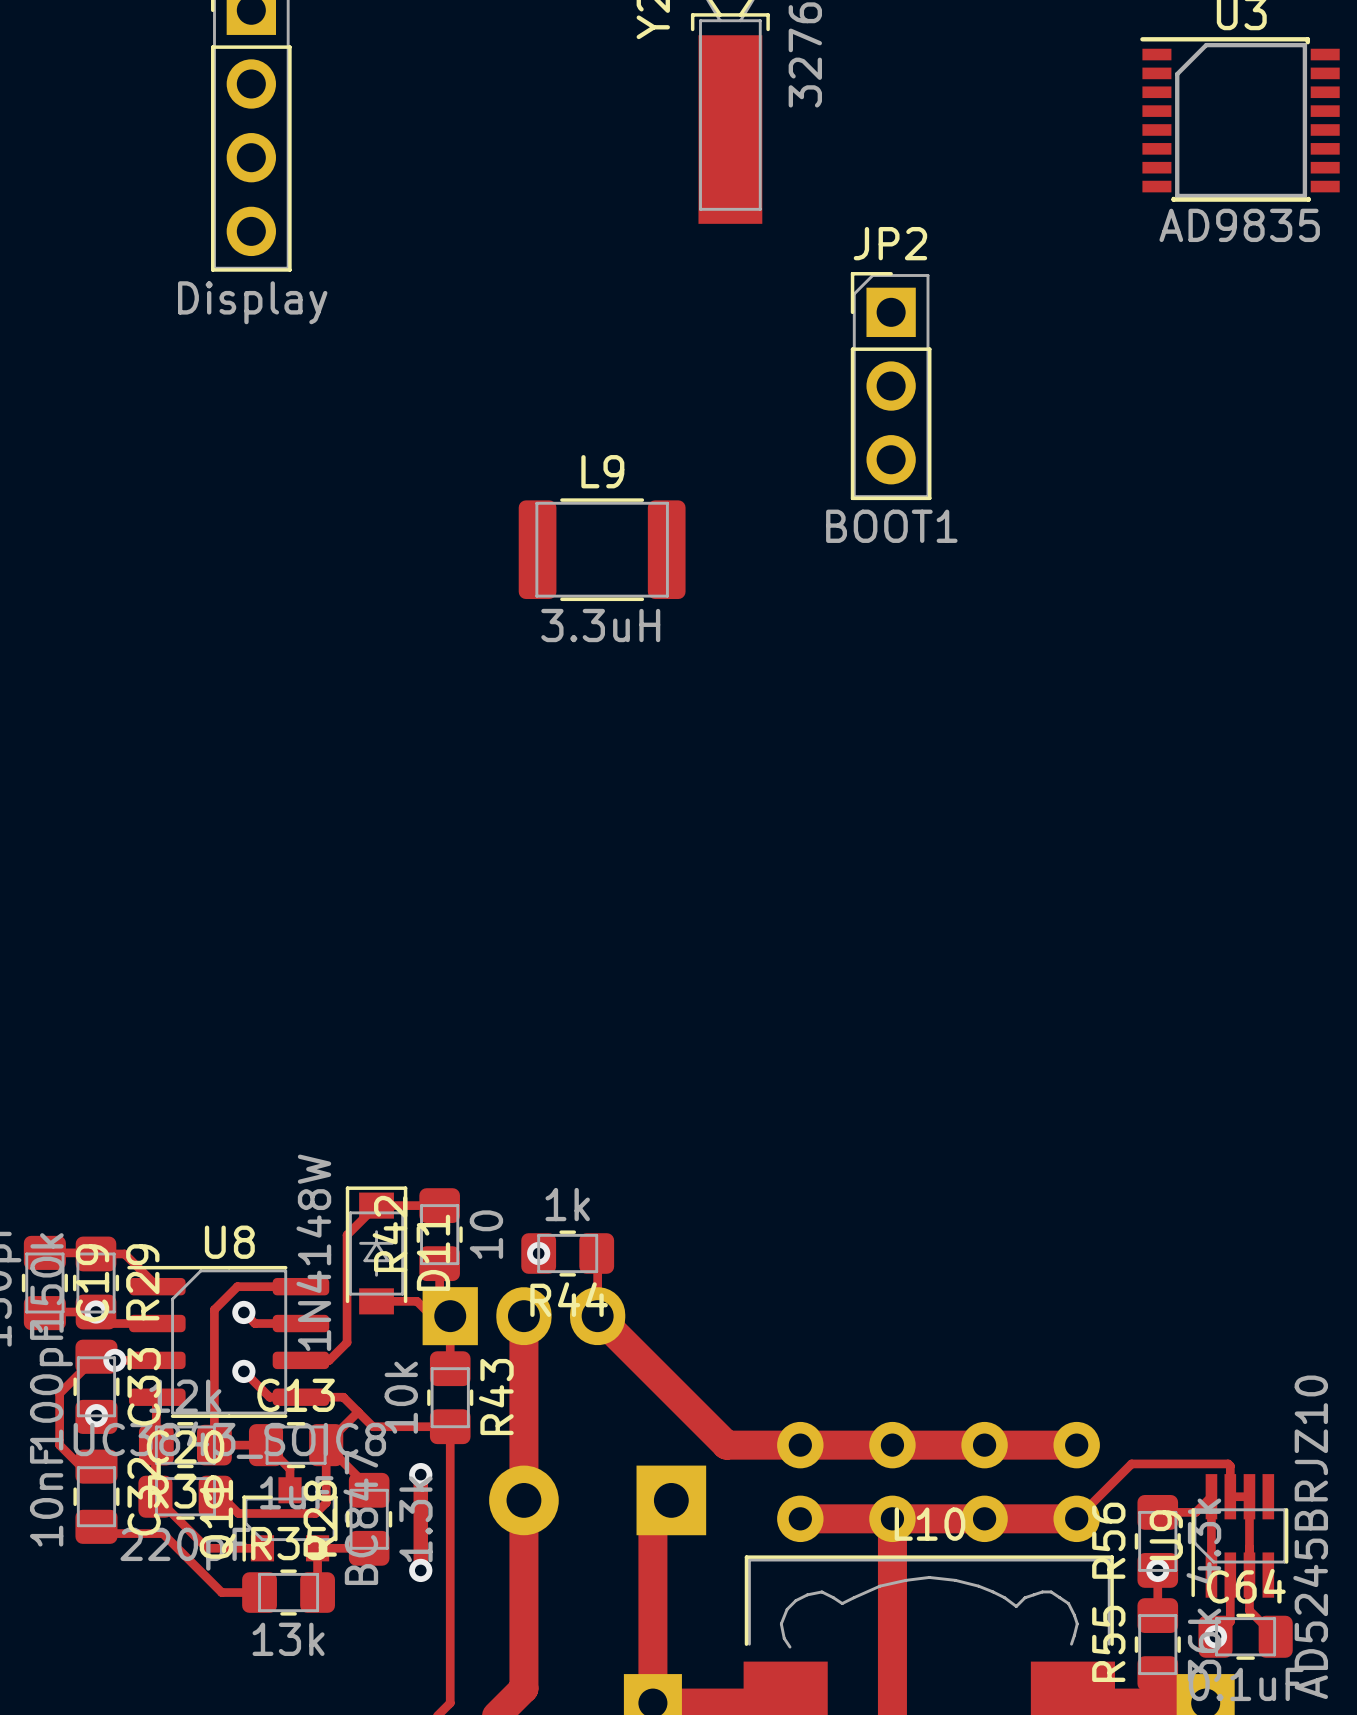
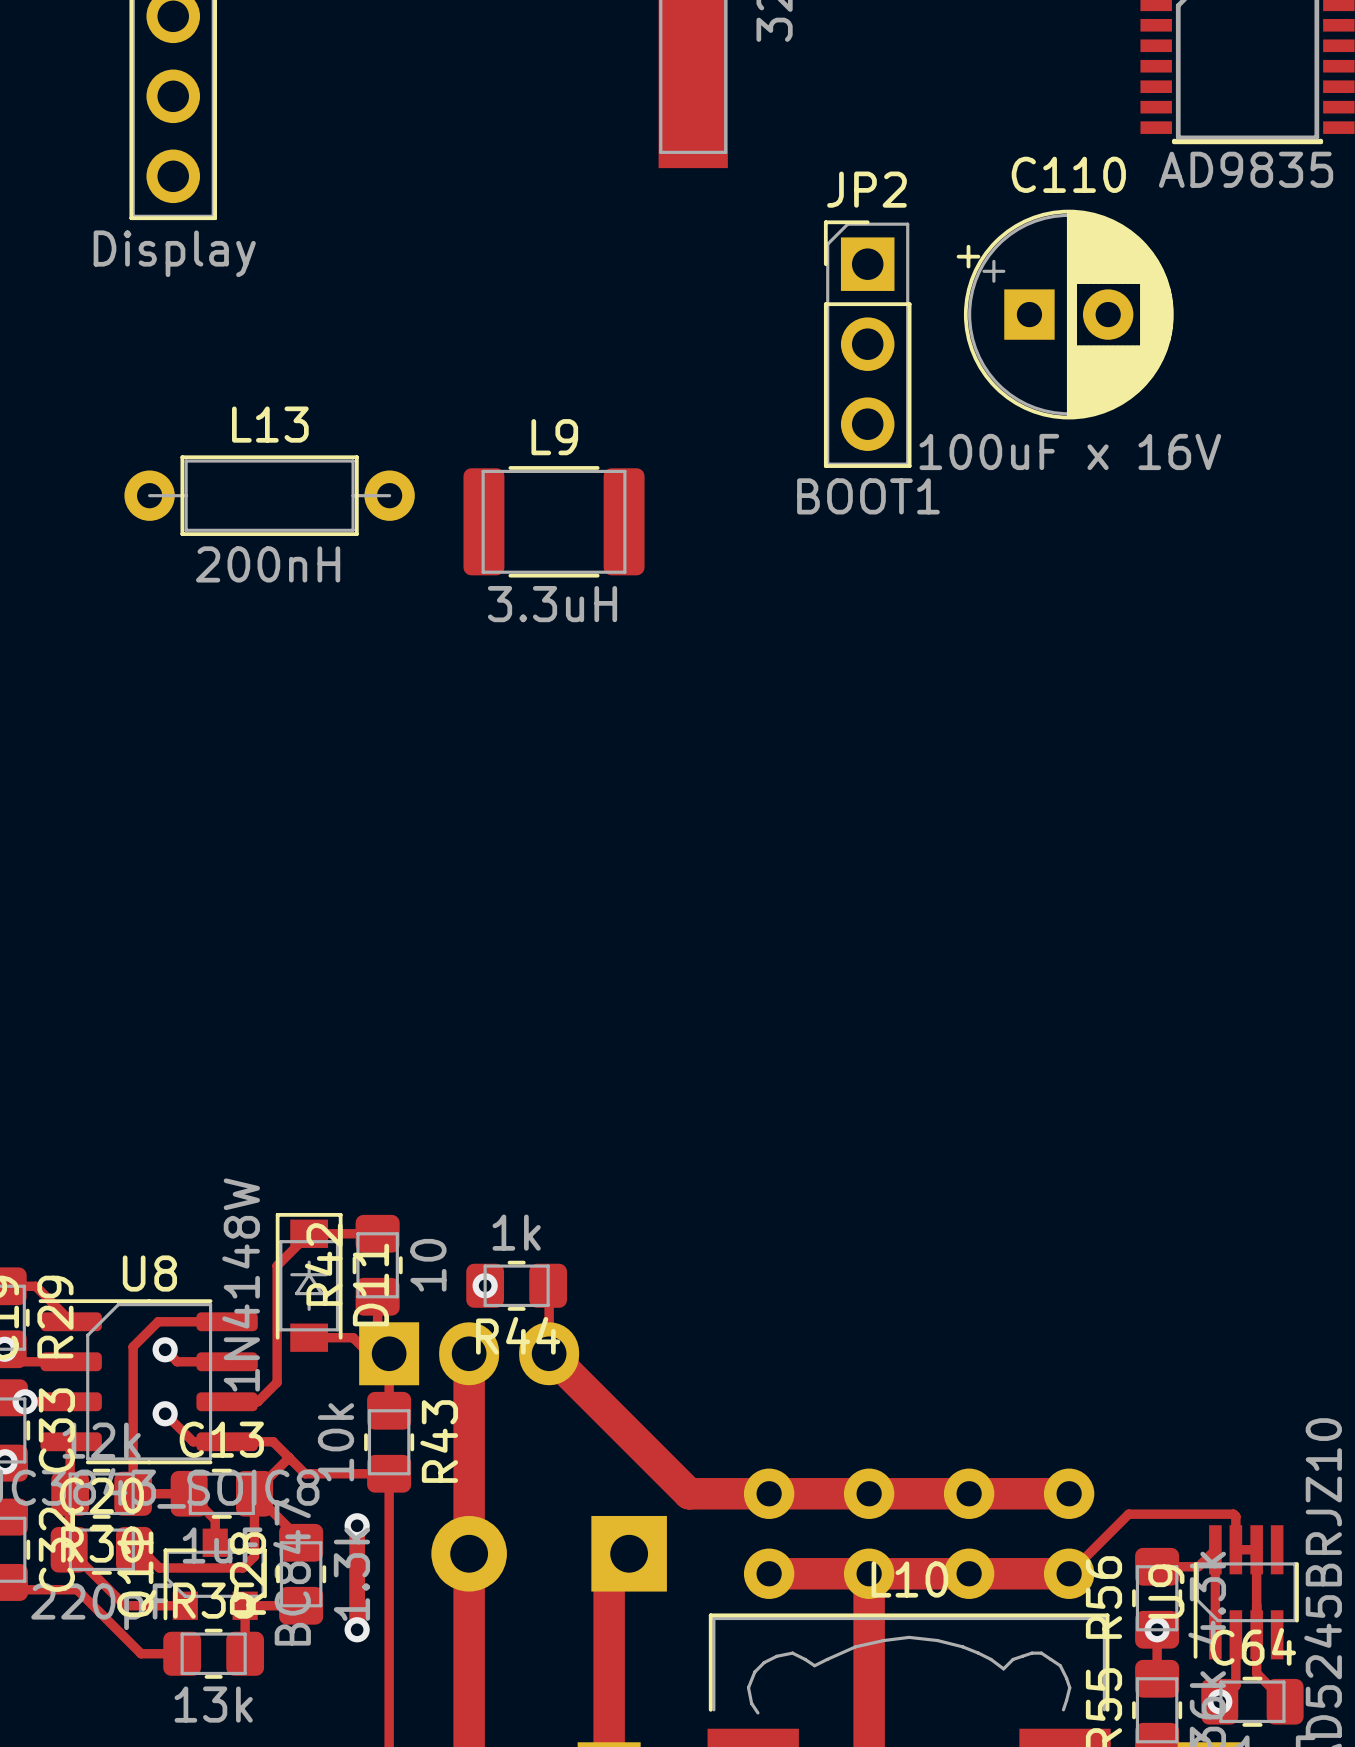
C110: none -> 100uF x 16V (1065, 314)
L13: none -> 200nH (269, 495)

